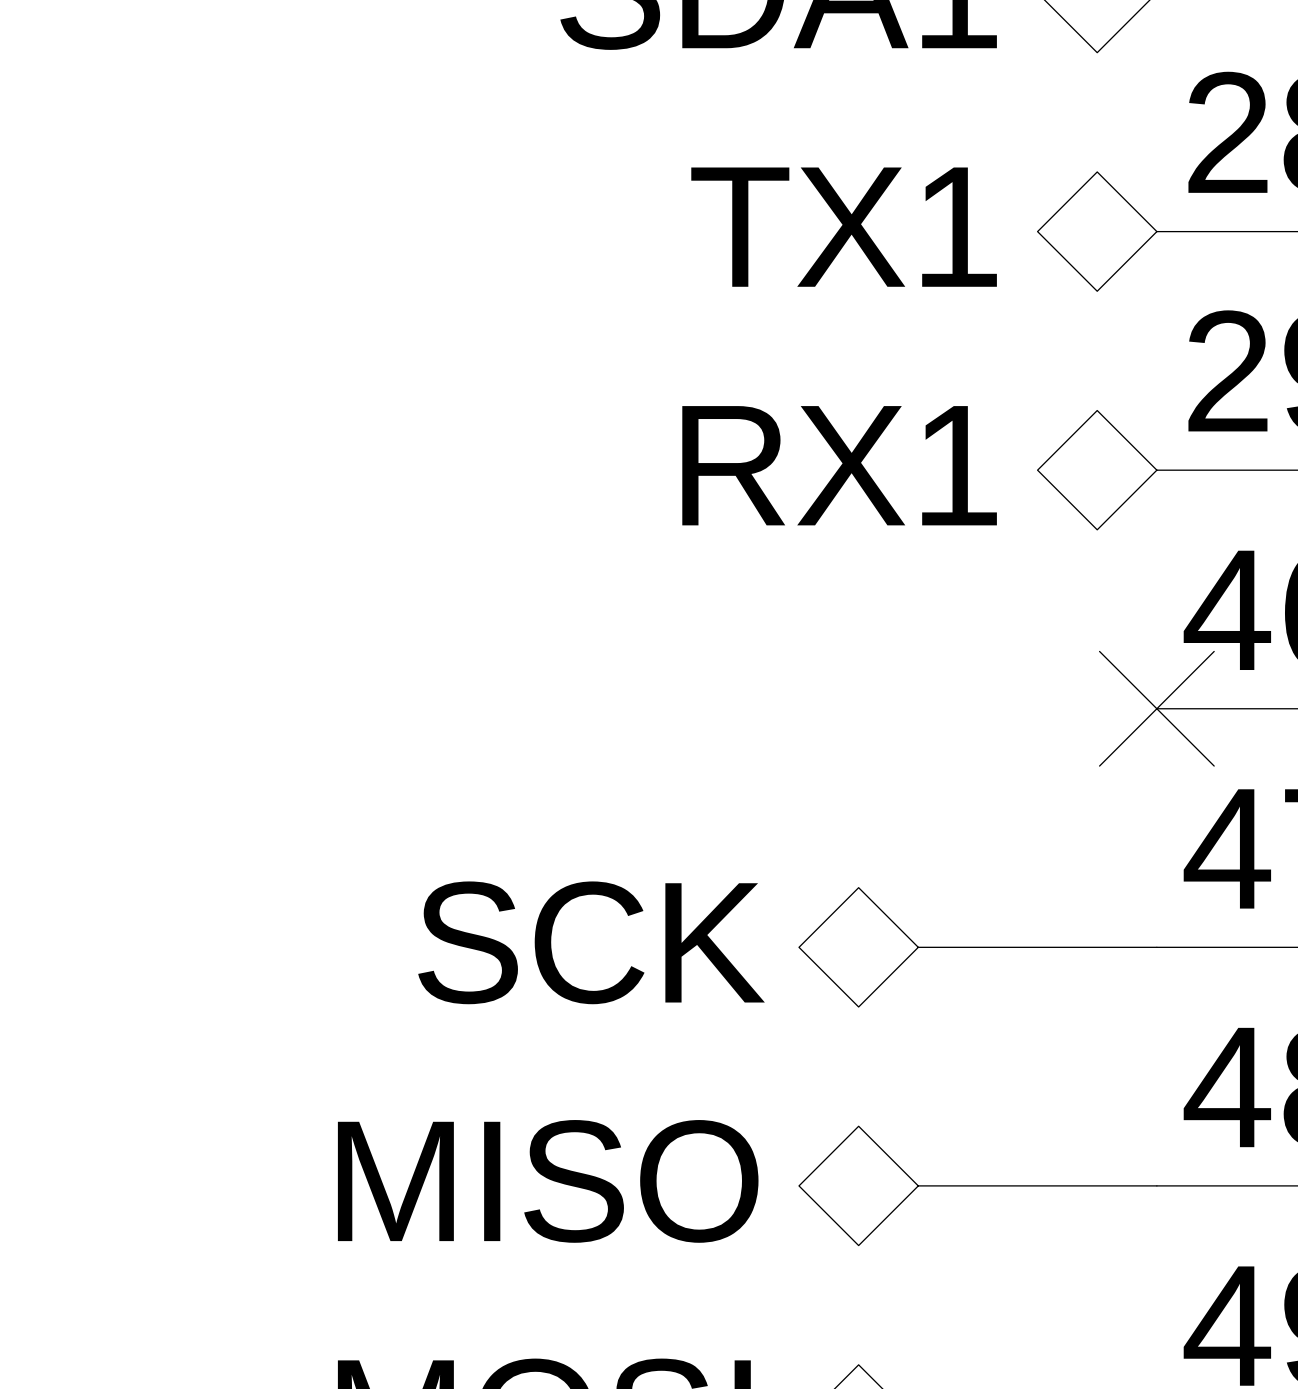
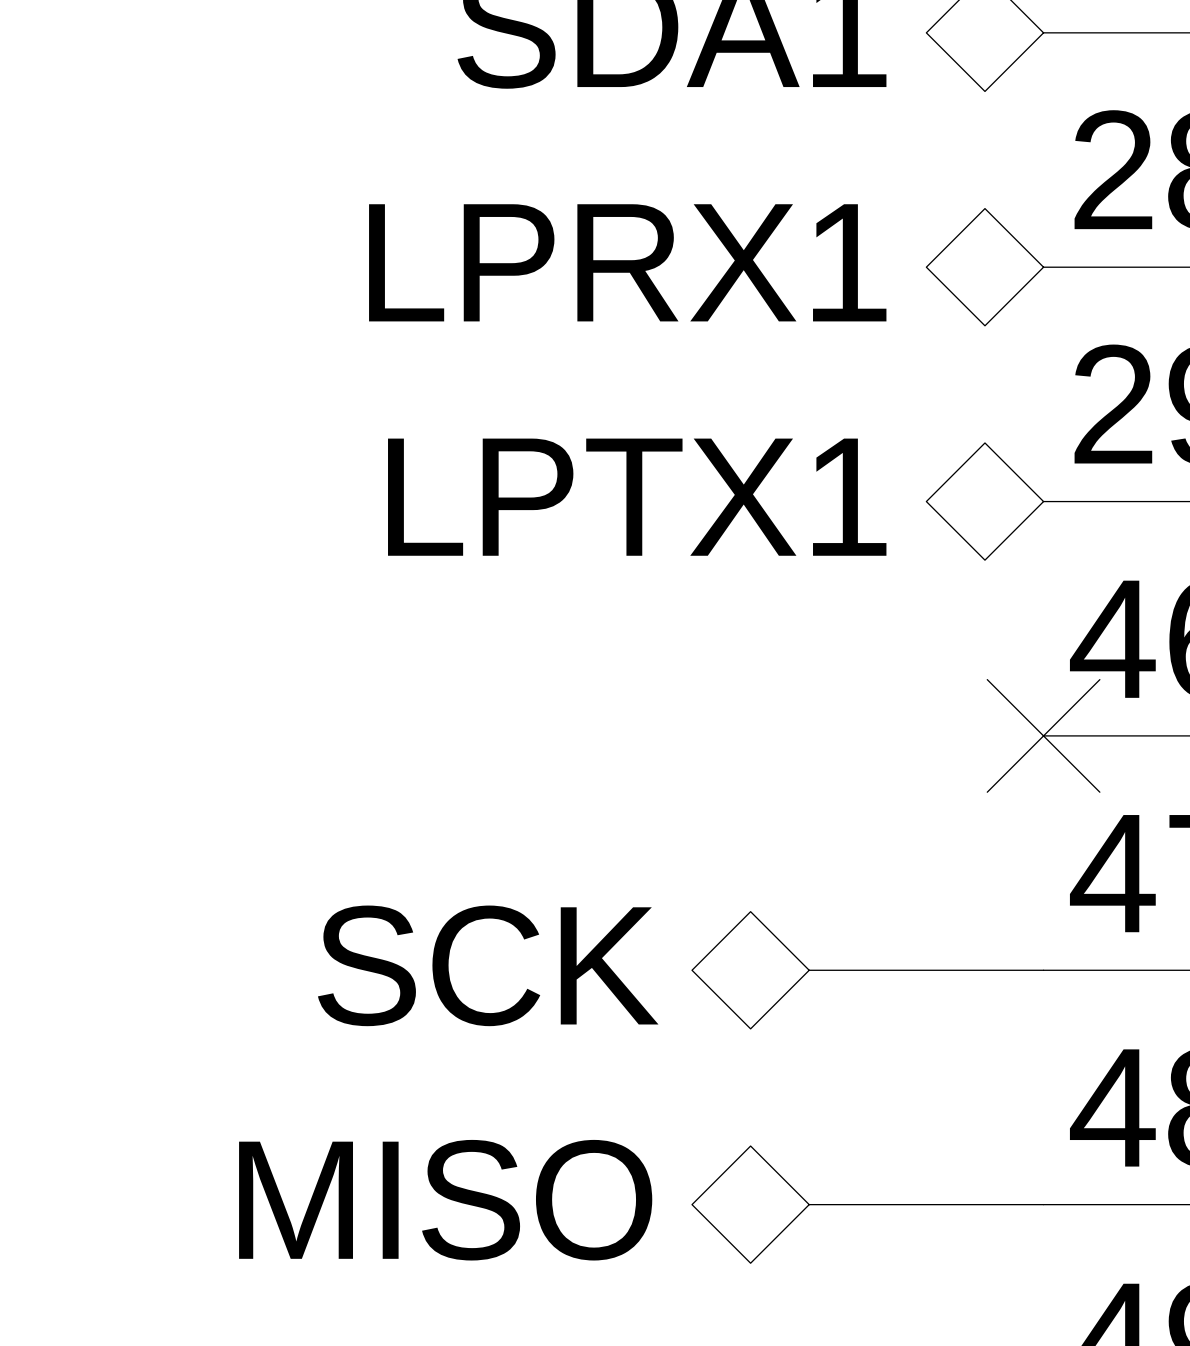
hierarchical label: TX1 (844, 227) -> LPRX1 (627, 262)
hierarchical label: RX1 (839, 465) -> LPTX1 (637, 497)

